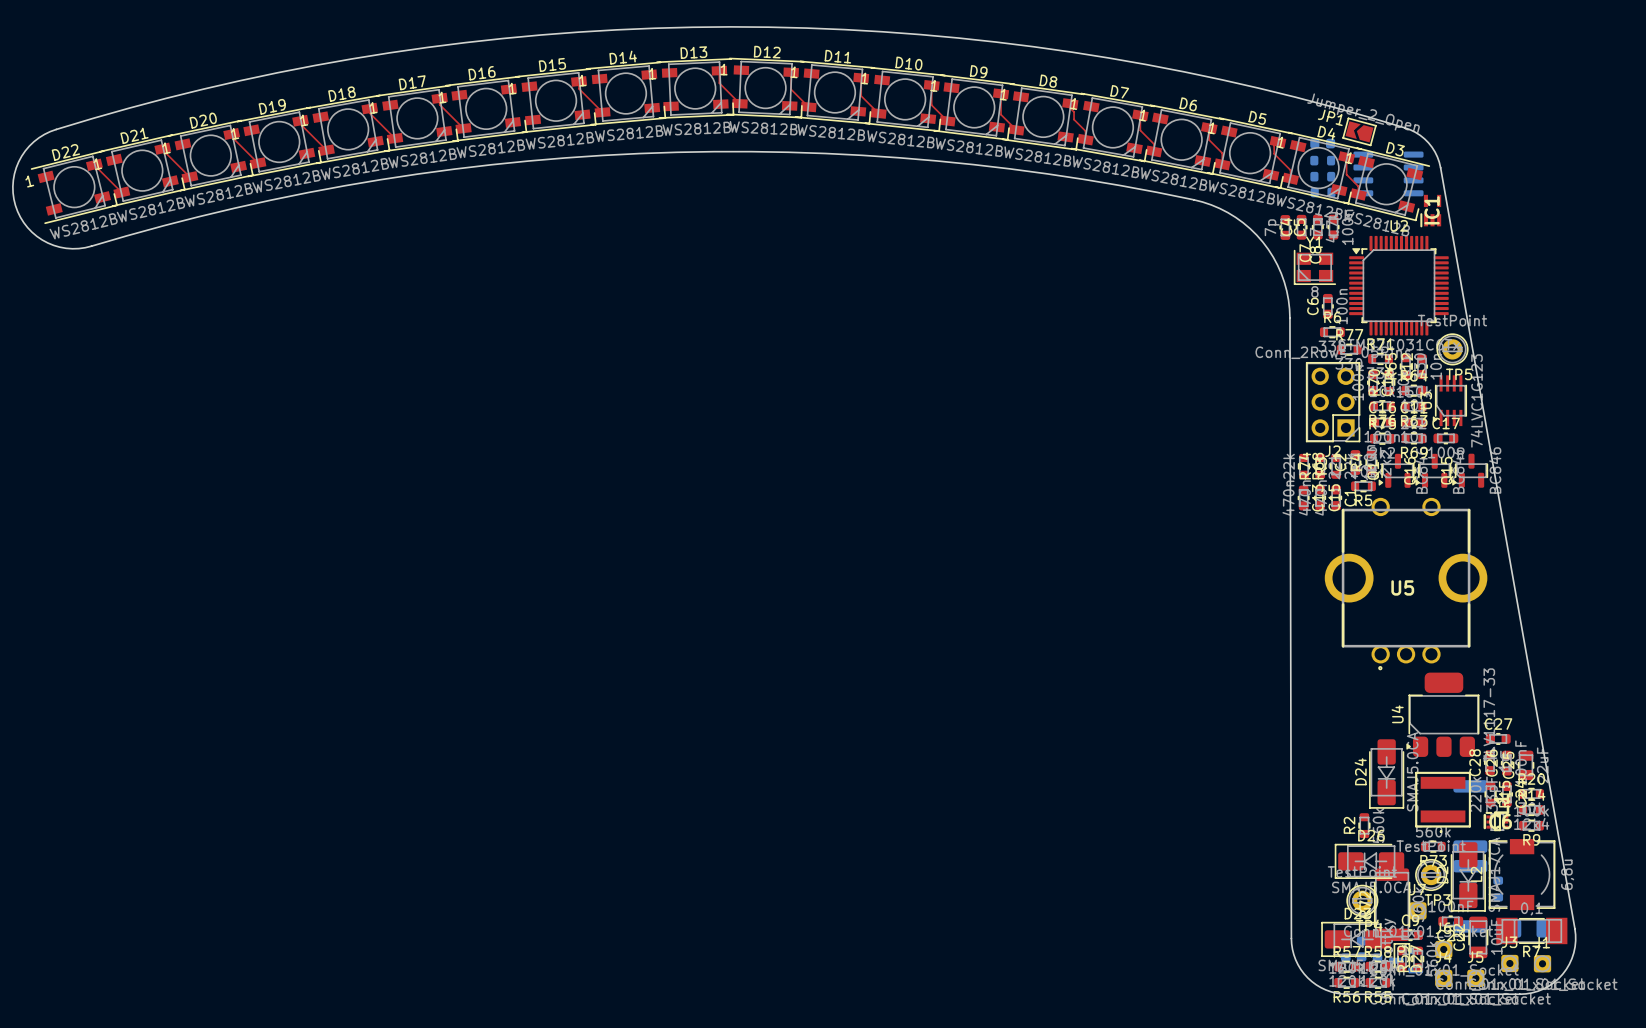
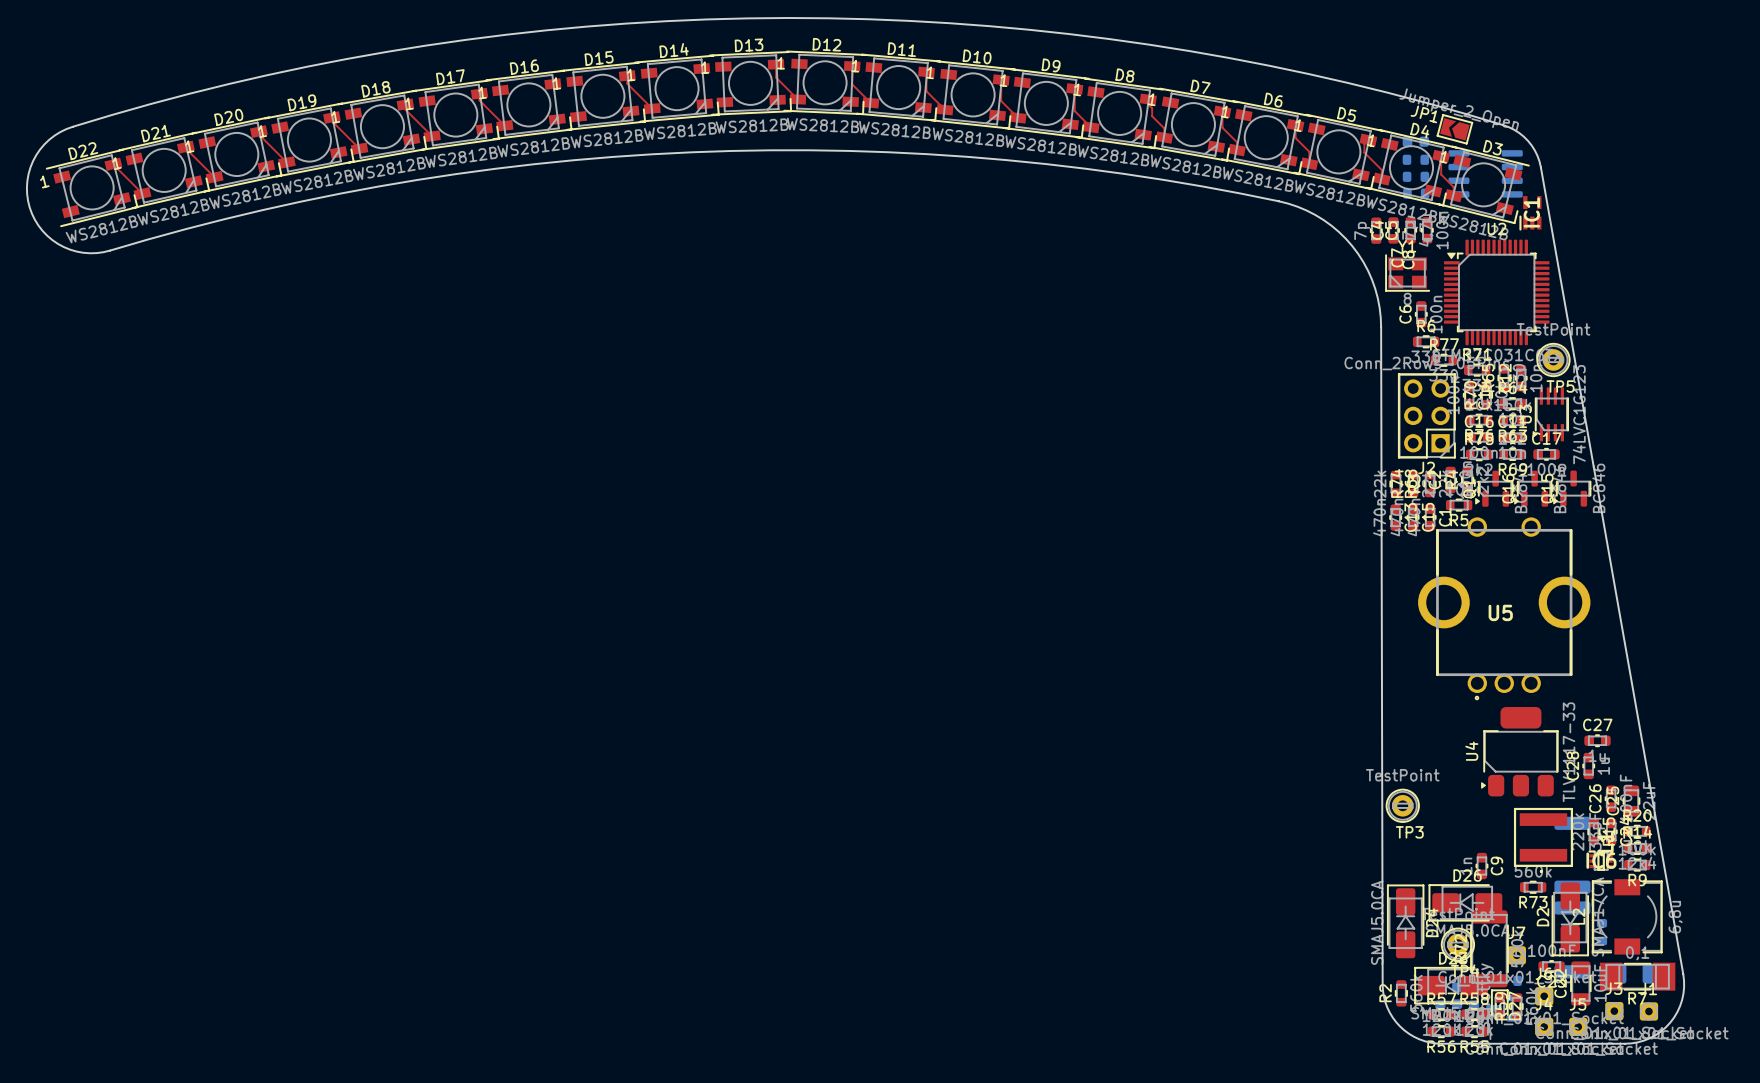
U4 position: (1442, 714) -> (1519, 751)
C27 position: (1498, 738) -> (1597, 740)
C28 position: (1489, 762) -> (1588, 765)
D24 rotation: 0° (1386, 773) -> 180° (1405, 921)
D24 position: (1386, 773) -> (1405, 921)
R2 position: (1364, 825) -> (1401, 993)
TP3 position: (1431, 874) -> (1402, 805)
C9 rotation: 0° (1410, 935) -> 90° clockwise (1481, 866)
C9 position: (1410, 935) -> (1481, 866)

